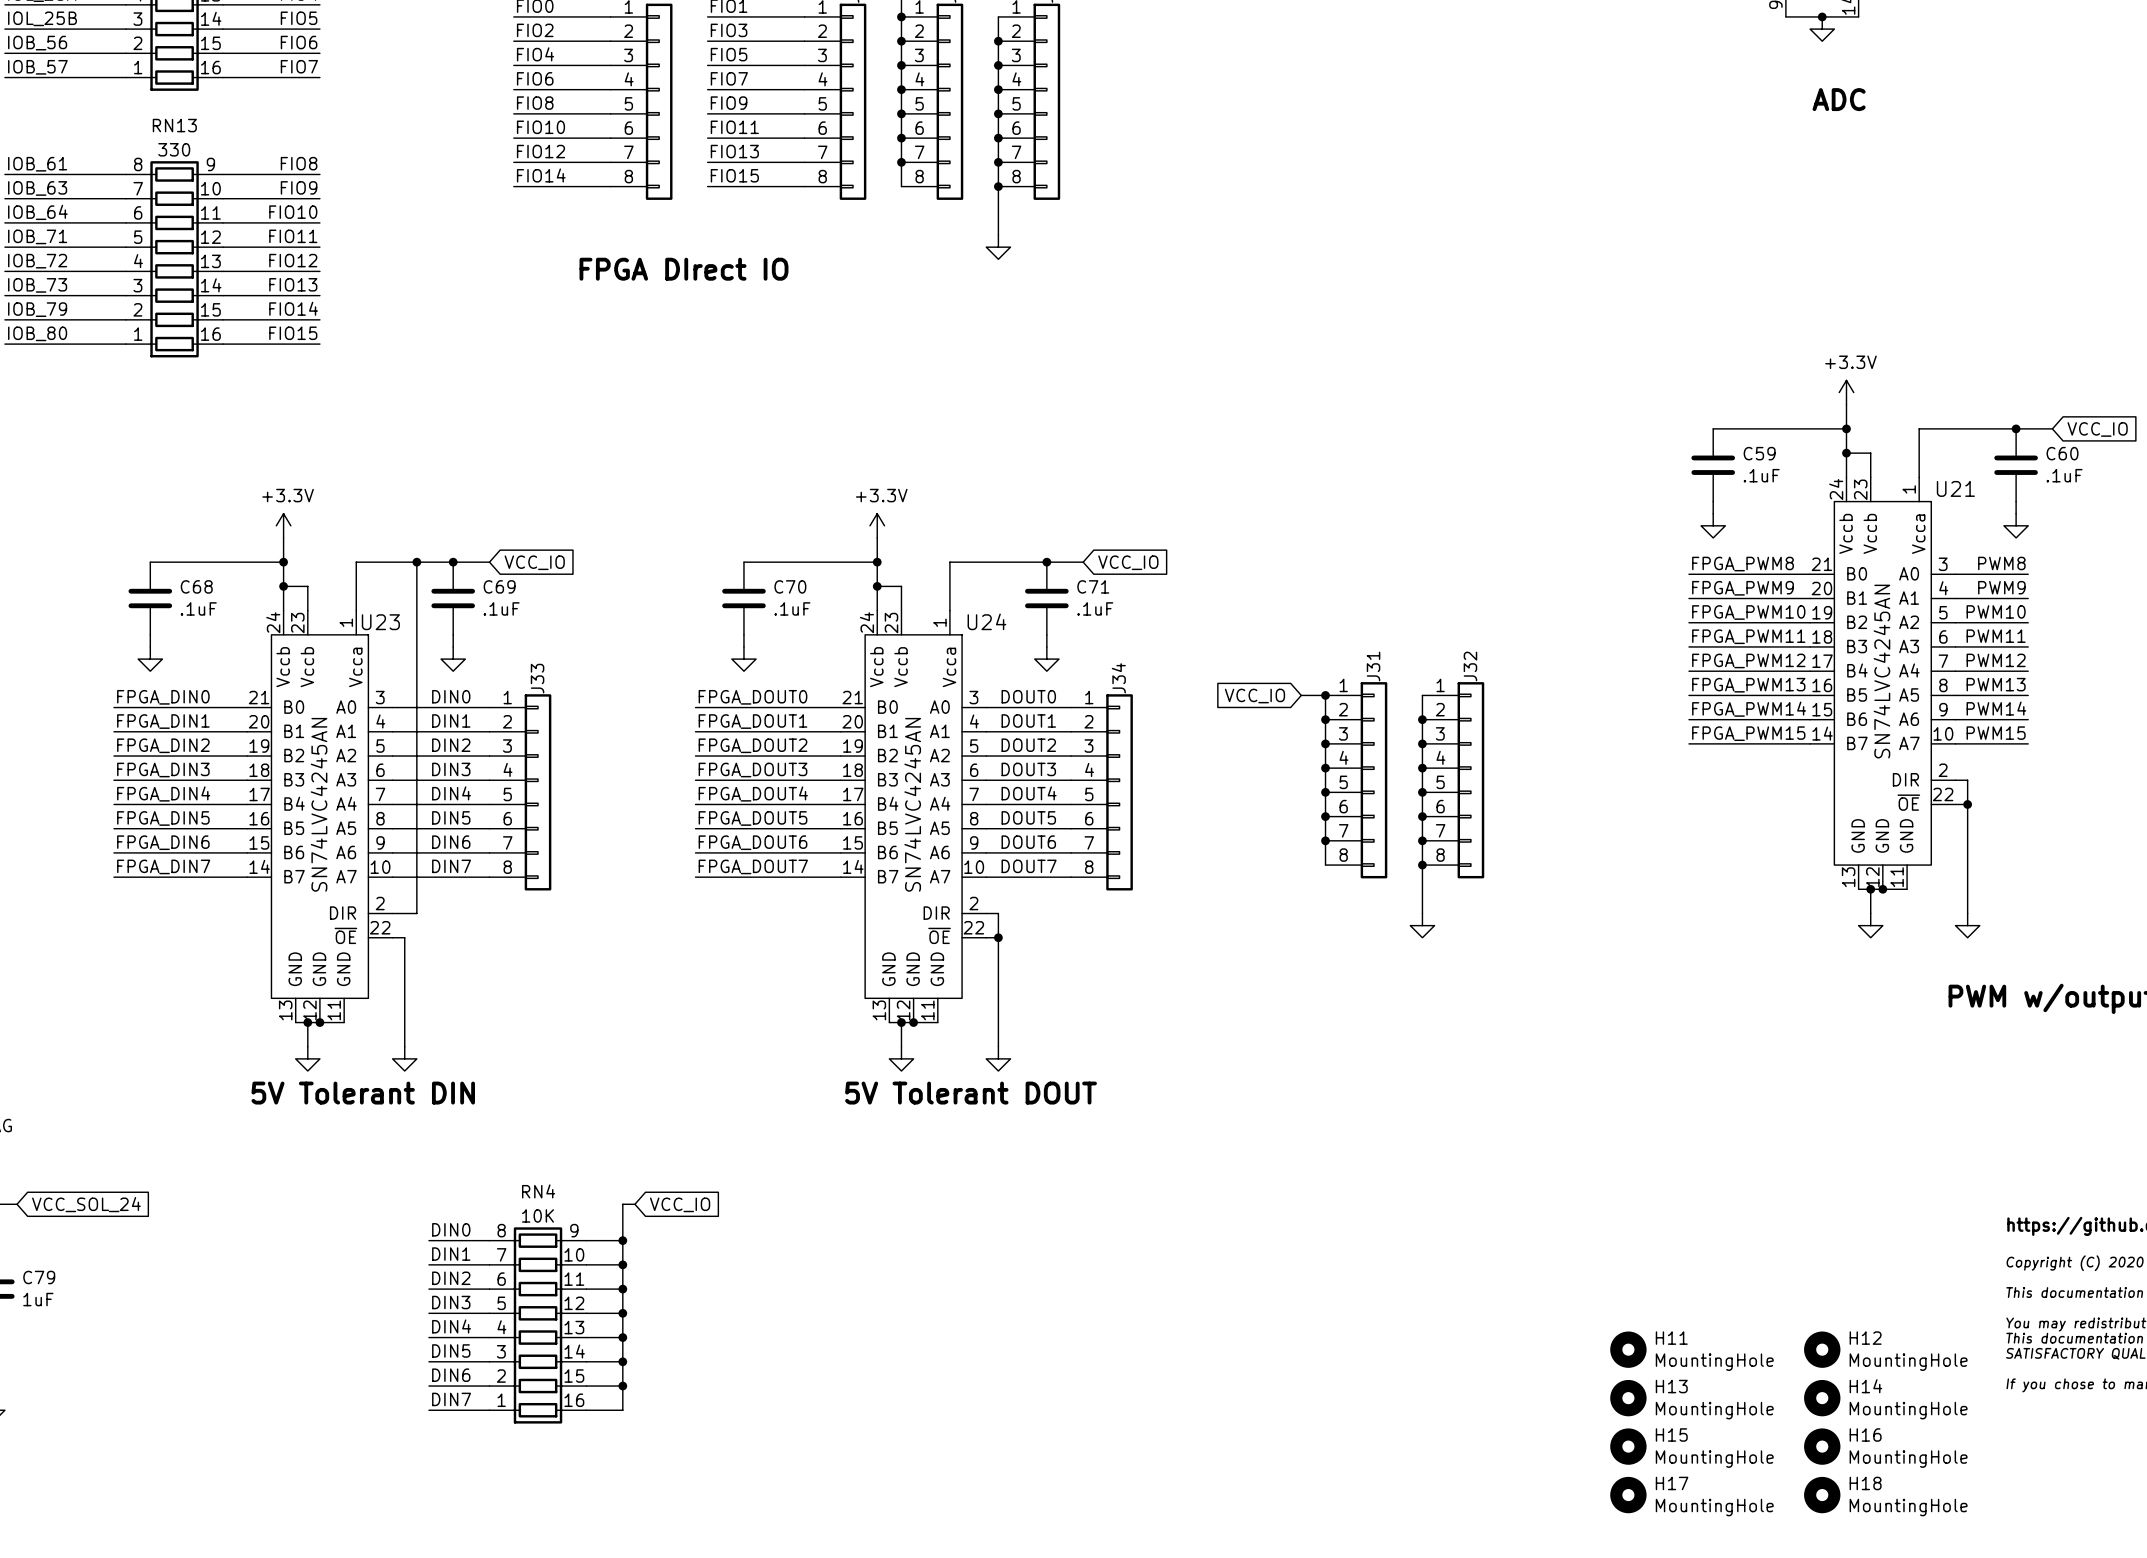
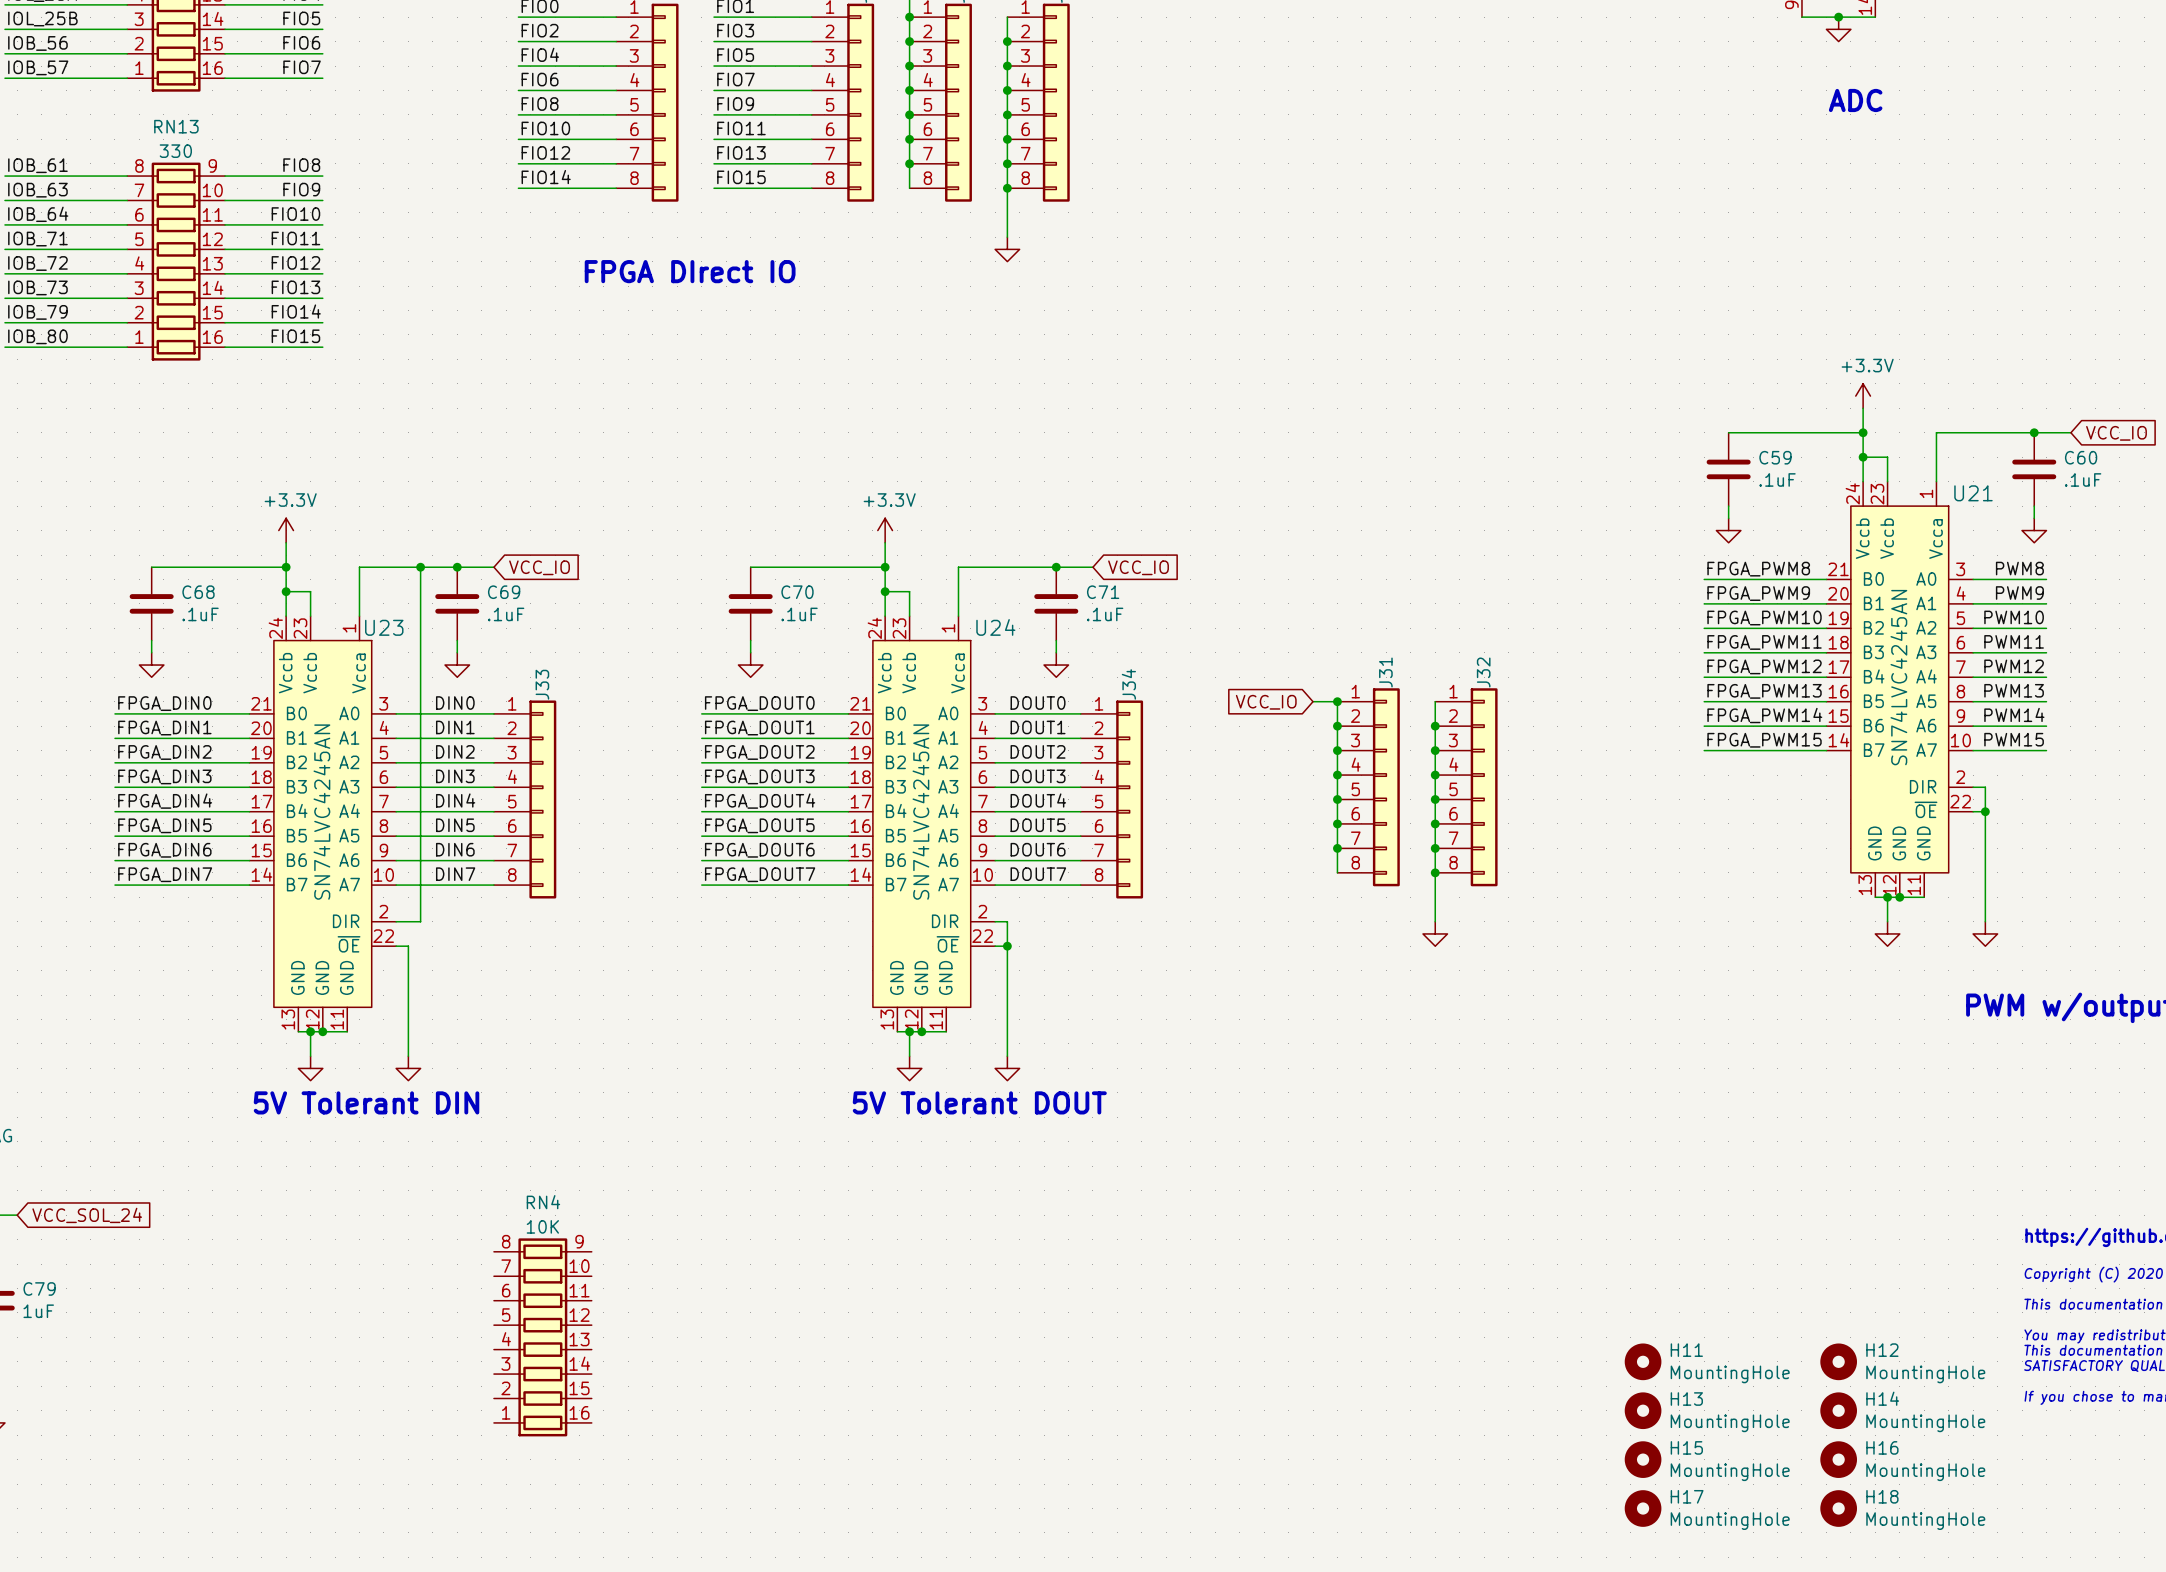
wire: (634, 1204) (622, 1204) (622, 1410) (586, 1410) -> none
global label: VCC_IO (680, 1204) -> none
label: DIN0 (451, 1229) -> none
wire: (428, 1240) (489, 1240) -> none
wire: (586, 1240) (622, 1240) -> none
junction: (622, 1240) -> none
label: DIN1 (451, 1254) -> none
wire: (428, 1264) (489, 1264) -> none
wire: (586, 1264) (622, 1264) -> none
junction: (622, 1264) -> none
label: DIN2 (451, 1278) -> none
wire: (428, 1289) (489, 1289) -> none
wire: (586, 1289) (622, 1289) -> none
junction: (622, 1289) -> none
label: DIN3 (451, 1302) -> none
wire: (428, 1313) (489, 1313) -> none
wire: (586, 1313) (622, 1313) -> none
junction: (622, 1313) -> none
label: DIN4 (451, 1326) -> none
wire: (428, 1337) (489, 1337) -> none
wire: (586, 1337) (622, 1337) -> none
junction: (622, 1337) -> none
label: DIN5 (451, 1350) -> none
wire: (428, 1361) (489, 1361) -> none
wire: (586, 1361) (622, 1361) -> none
junction: (622, 1361) -> none
label: DIN6 (451, 1375) -> none
wire: (428, 1386) (489, 1386) -> none
wire: (586, 1386) (622, 1386) -> none
junction: (622, 1386) -> none
label: DIN7 (451, 1399) -> none
wire: (428, 1410) (489, 1410) -> none

